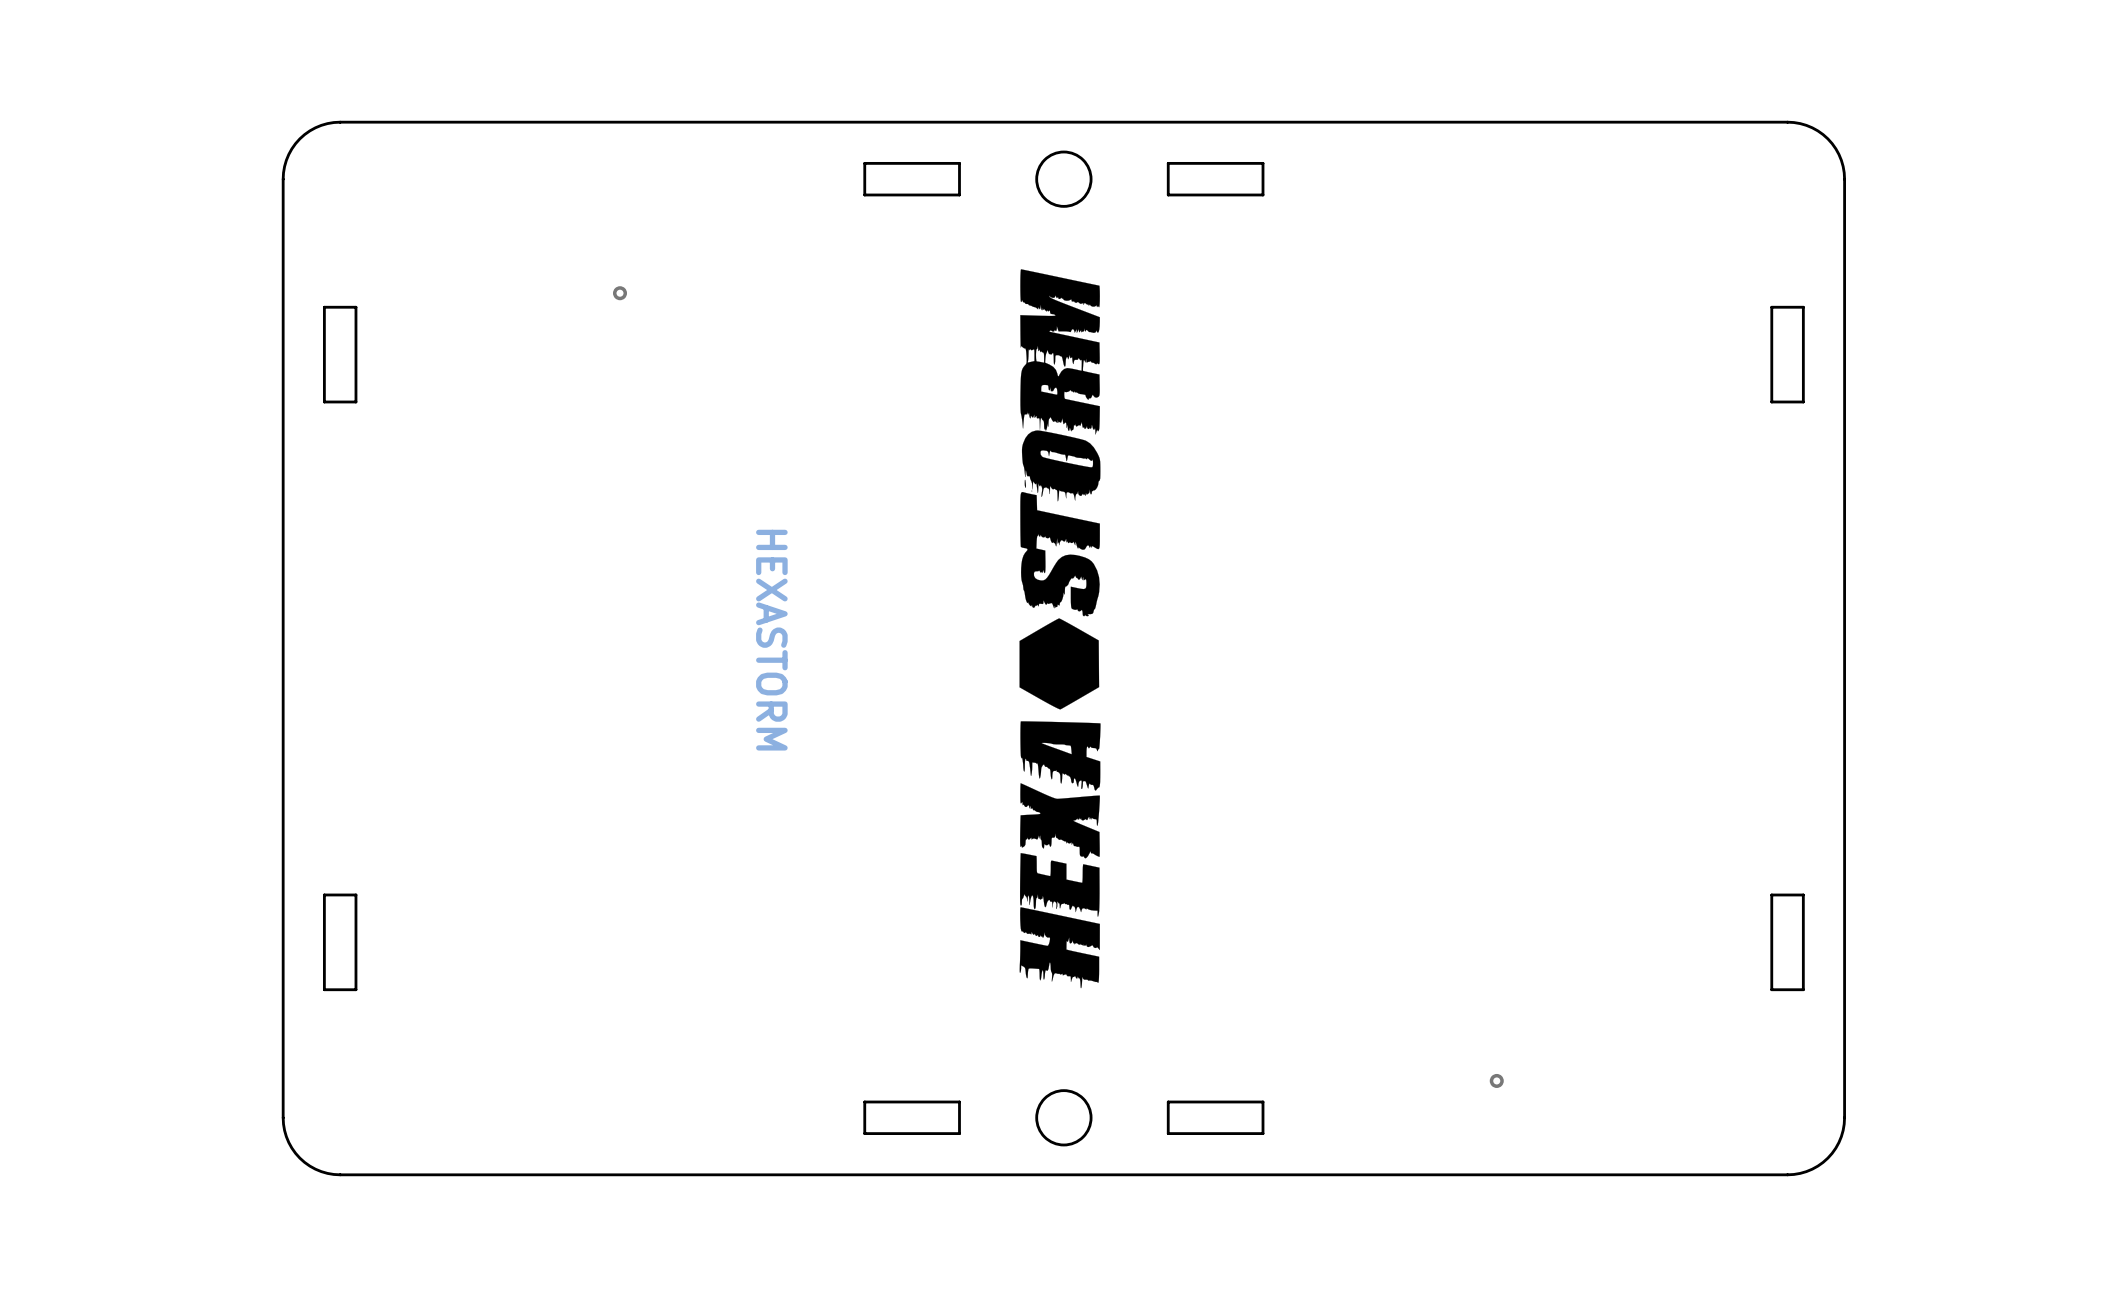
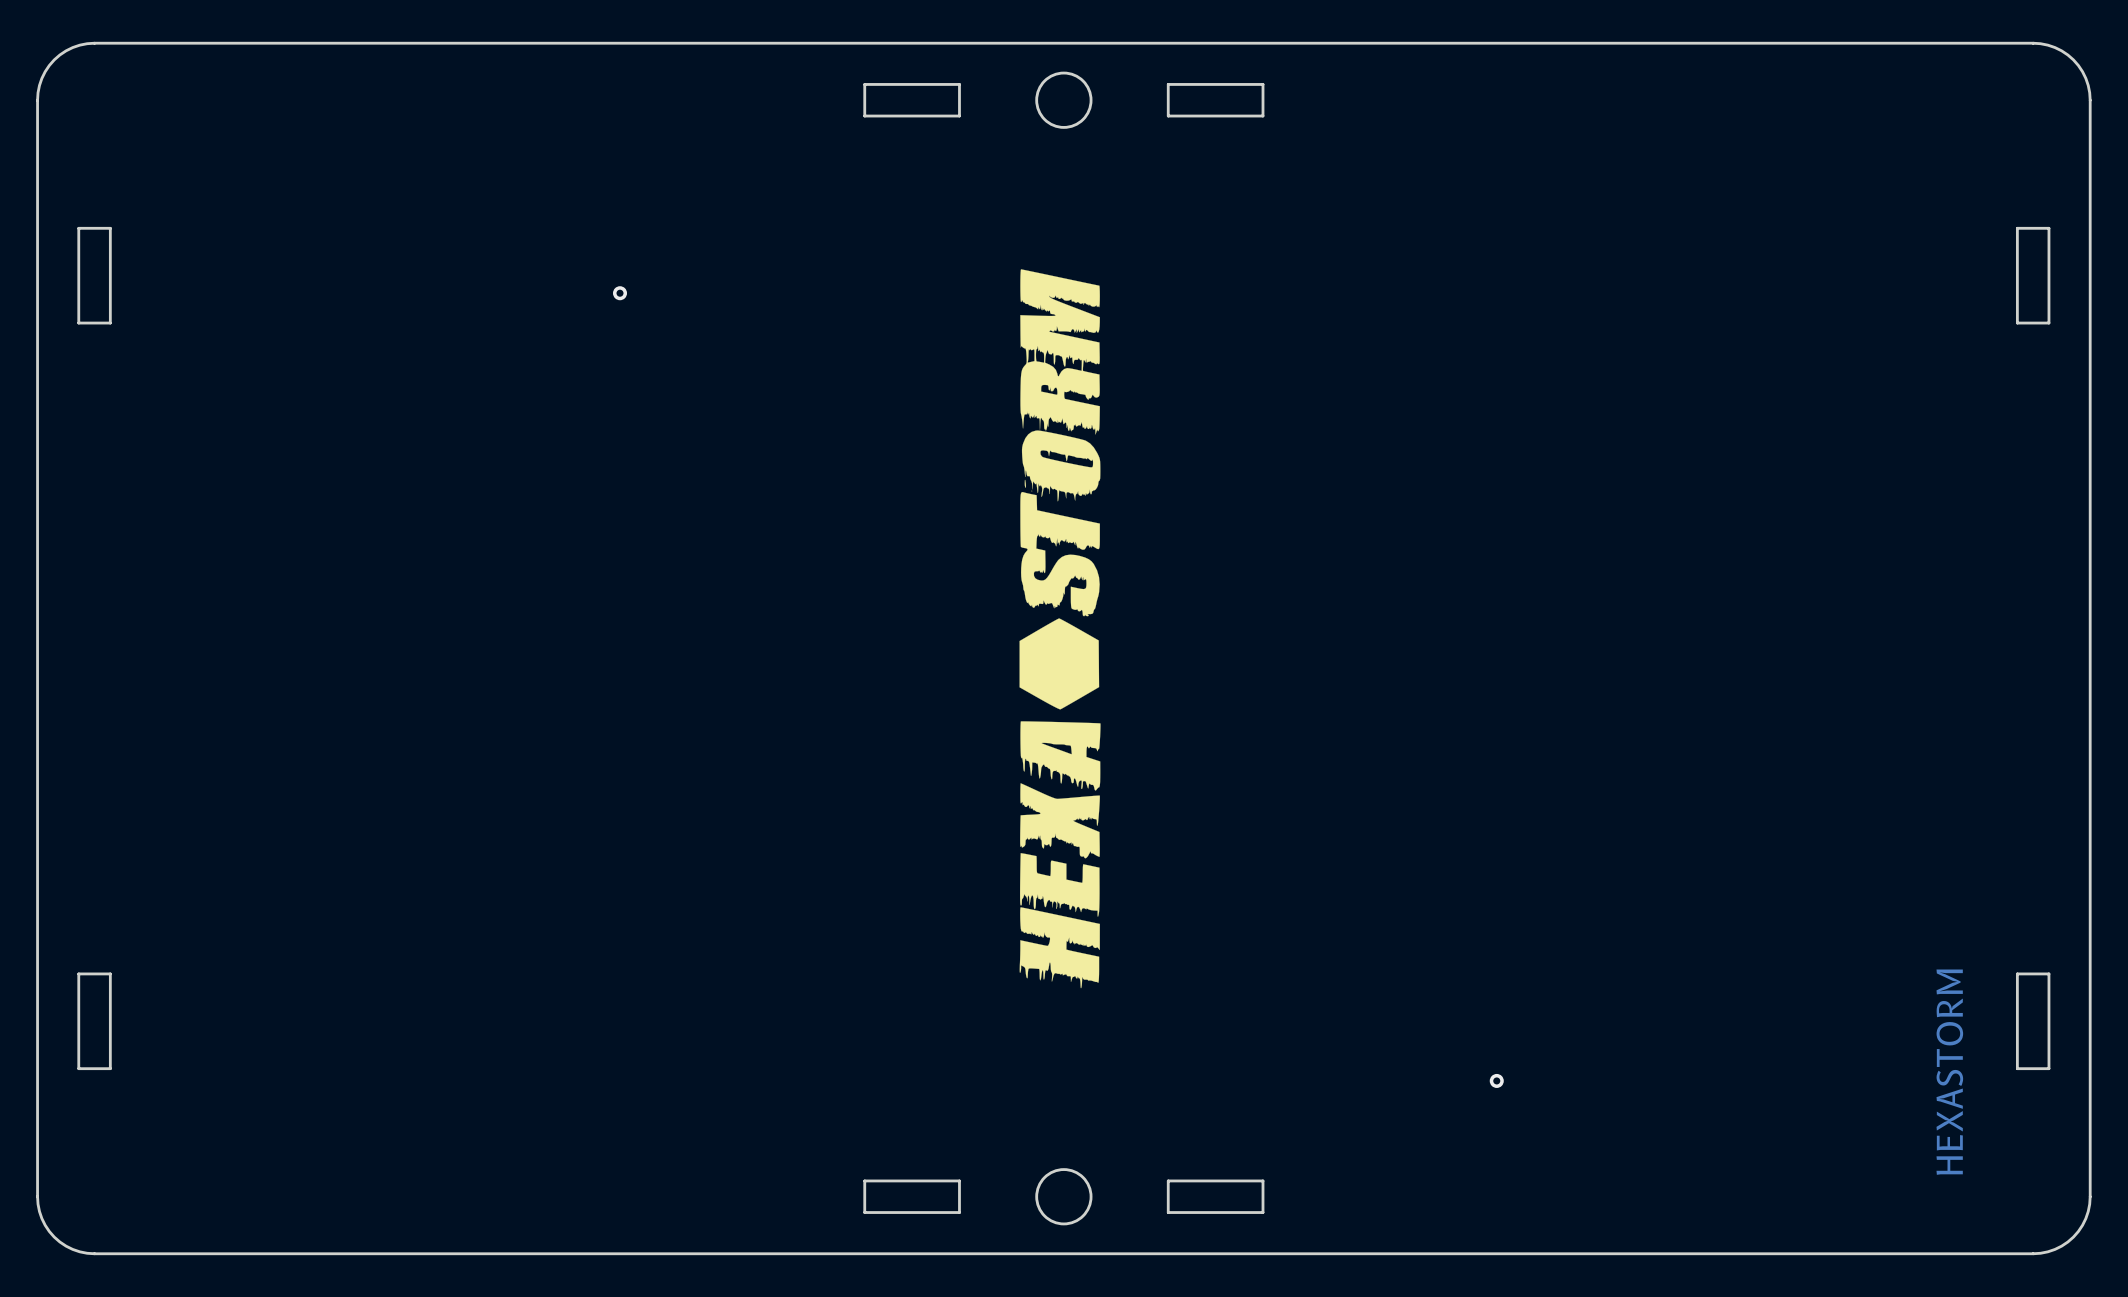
board edge: (1787, 122) (340, 122) (327, 123) (309, 130) (299, 138) (288, 154) (283, 179) (283, 1117) (284, 1130) (291, 1148) (299, 1158) (315, 1169) (340, 1174) (1787, 1174) (1806, 1171) (1817, 1166) (1835, 1148) (1841, 1136) (1844, 1117) (1844, 179) (1841, 160) (1827, 138) (1812, 127) (1787, 122) -> (2033, 43) (2055, 47) (2073, 59) (2085, 78) (2090, 100) (2090, 1196) (2088, 1211) (2082, 1225) (2073, 1237) (2061, 1246) (2047, 1251) (2033, 1253) (94, 1253) (79, 1251) (66, 1246) (54, 1237) (45, 1225) (39, 1211) (37, 1196) (37, 100) (39, 85) (45, 71) (54, 59) (66, 50) (79, 45) (94, 43) (2033, 43)
board edge: (959, 163) (959, 194) (864, 194) (864, 163) (959, 163) -> (959, 84) (959, 116) (864, 116) (864, 84) (959, 84)
board edge: (1263, 163) (1168, 163) (1168, 194) (1263, 194) (1263, 163) -> (1262, 84) (1168, 84) (1168, 116) (1262, 116) (1262, 84)
round board edge position: (1063, 179) -> (1063, 100)
board edge: (355, 307) (355, 401) (324, 401) (324, 307) (355, 307) -> (110, 228) (110, 323) (78, 323) (78, 228) (110, 228)
board edge: (1803, 307) (1771, 307) (1771, 401) (1803, 401) (1803, 307) -> (2048, 228) (2017, 228) (2017, 323) (2048, 323) (2048, 228)
text: HEXASTORM (771, 640) -> none
board edge: (355, 894) (355, 989) (324, 989) (324, 894) (355, 894) -> (110, 973) (110, 1068) (78, 1068) (78, 973) (110, 973)
board edge: (1803, 894) (1771, 894) (1771, 989) (1803, 989) (1803, 894) -> (2048, 973) (2017, 973) (2017, 1068) (2048, 1068) (2048, 973)
text: none -> HEXASTORM (1949, 1072)
board edge: (959, 1101) (959, 1133) (864, 1133) (864, 1101) (959, 1101) -> (959, 1180) (959, 1212) (864, 1212) (864, 1180) (959, 1180)
board edge: (1263, 1101) (1168, 1101) (1168, 1133) (1263, 1133) (1263, 1101) -> (1262, 1180) (1168, 1180) (1168, 1212) (1262, 1212) (1262, 1180)
round board edge position: (1063, 1117) -> (1063, 1196)

